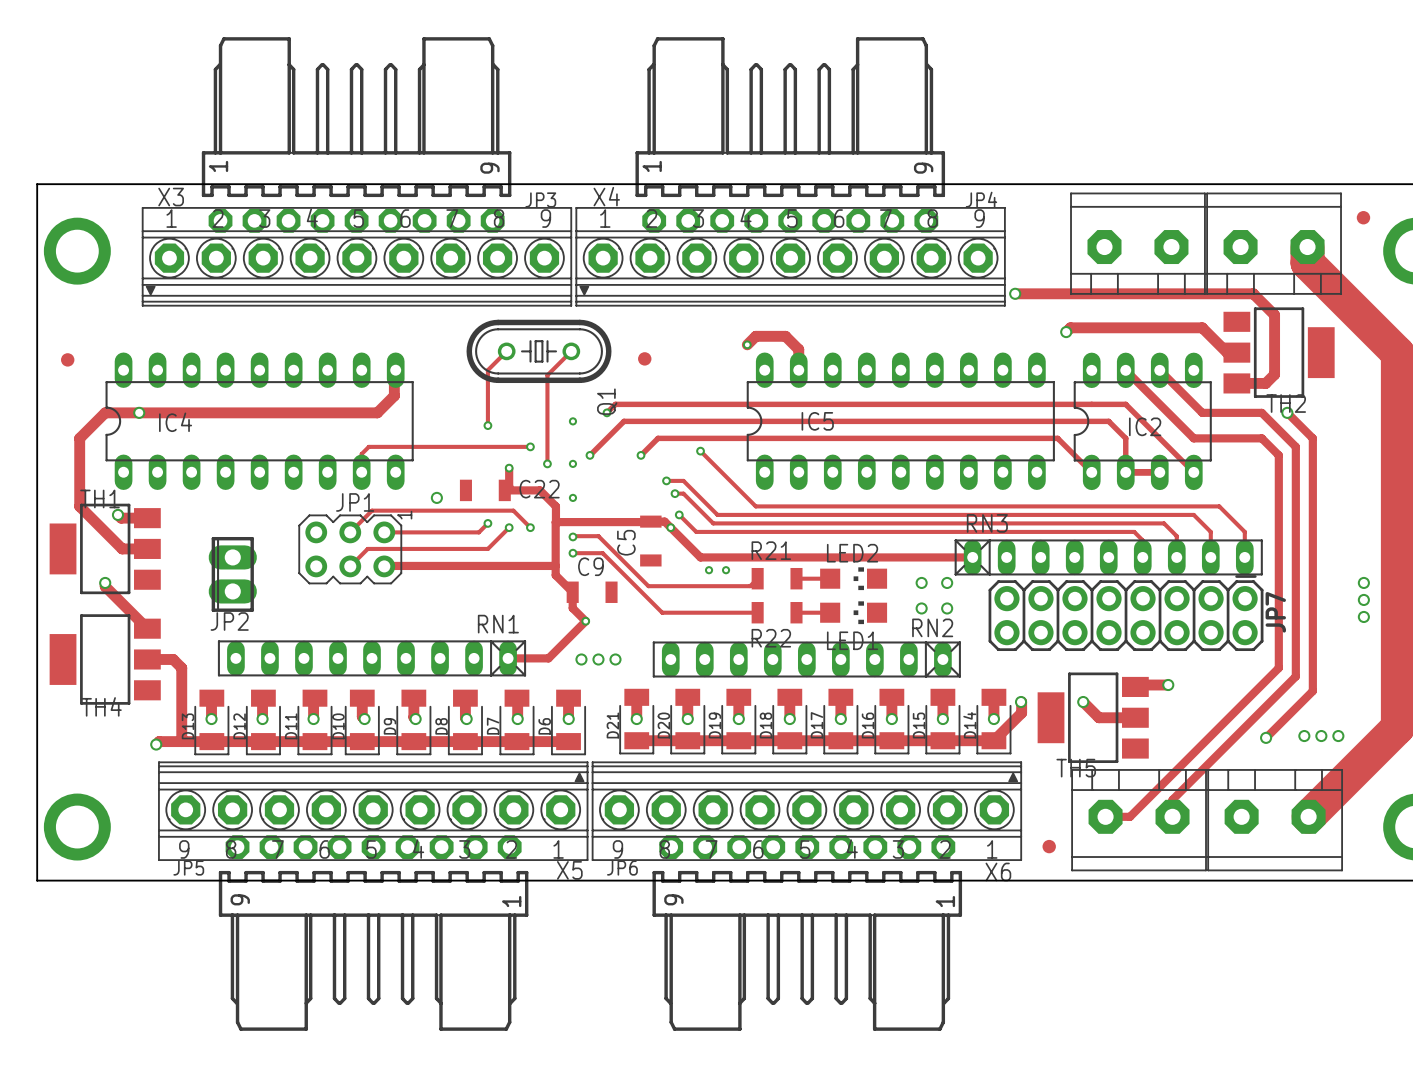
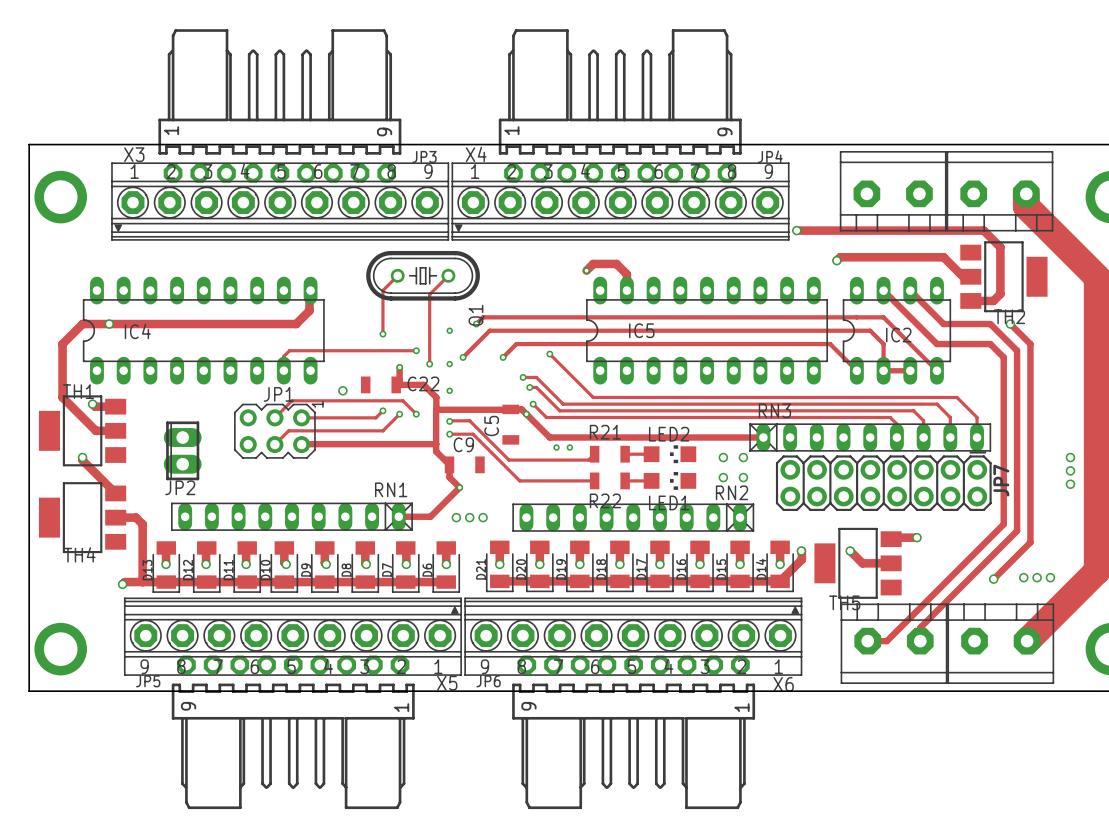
part: (1363, 217) -> none
part: (644, 358) -> none
part: (67, 359) -> none
part: (1049, 846) -> none

